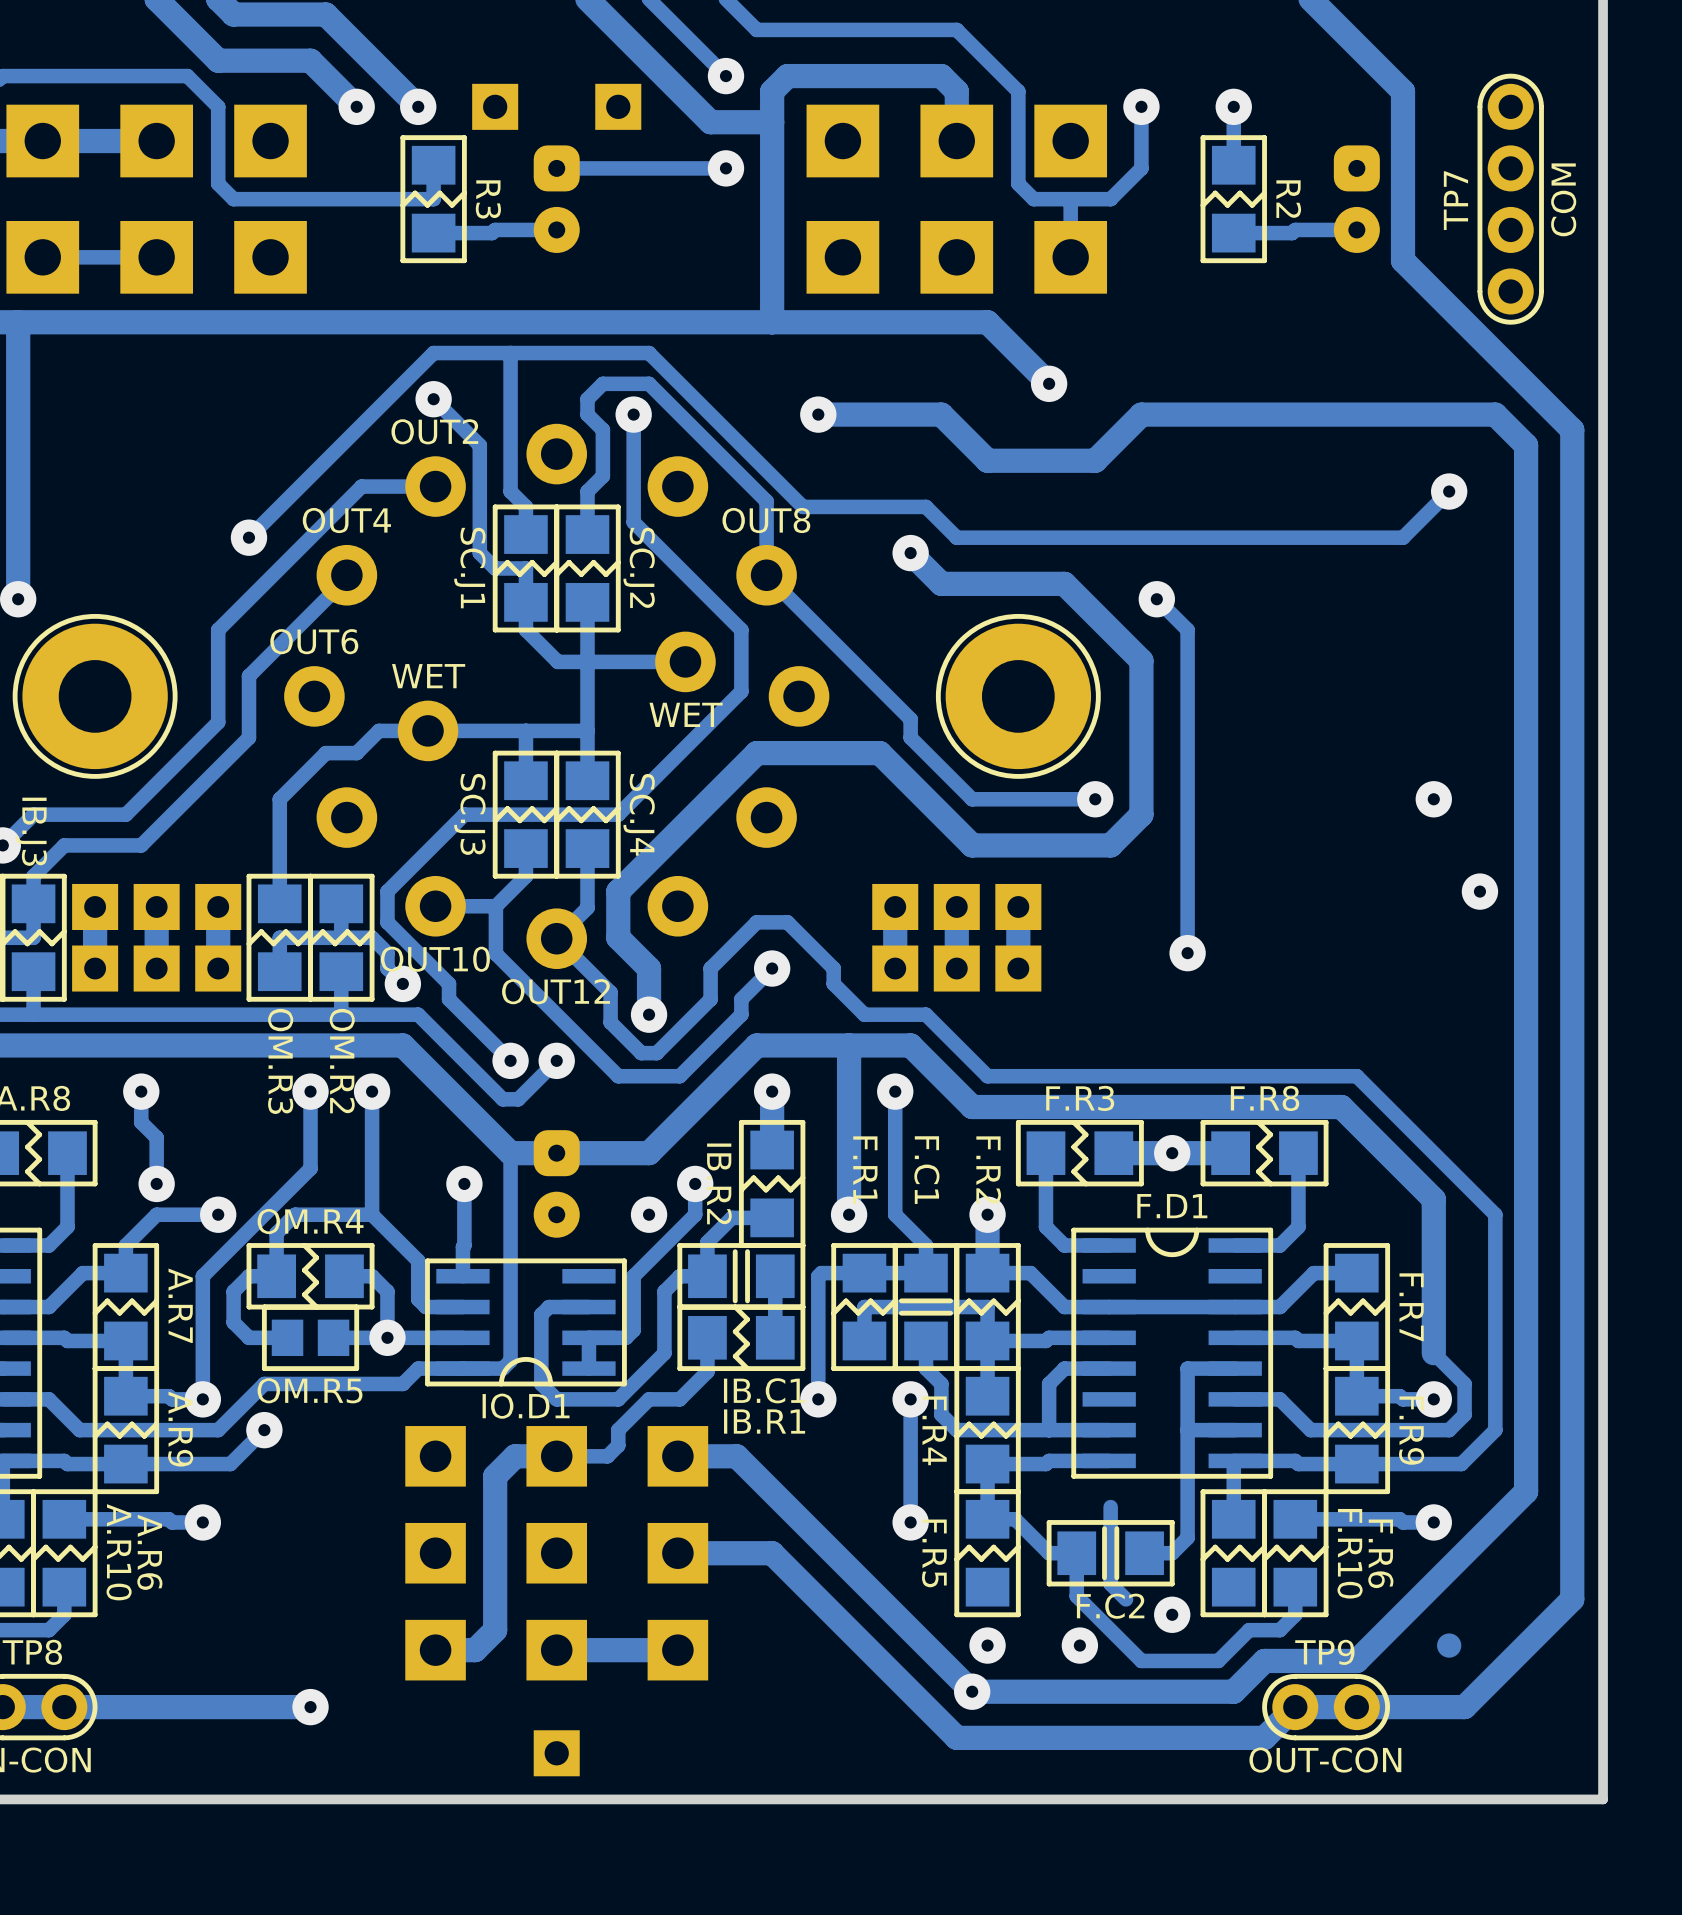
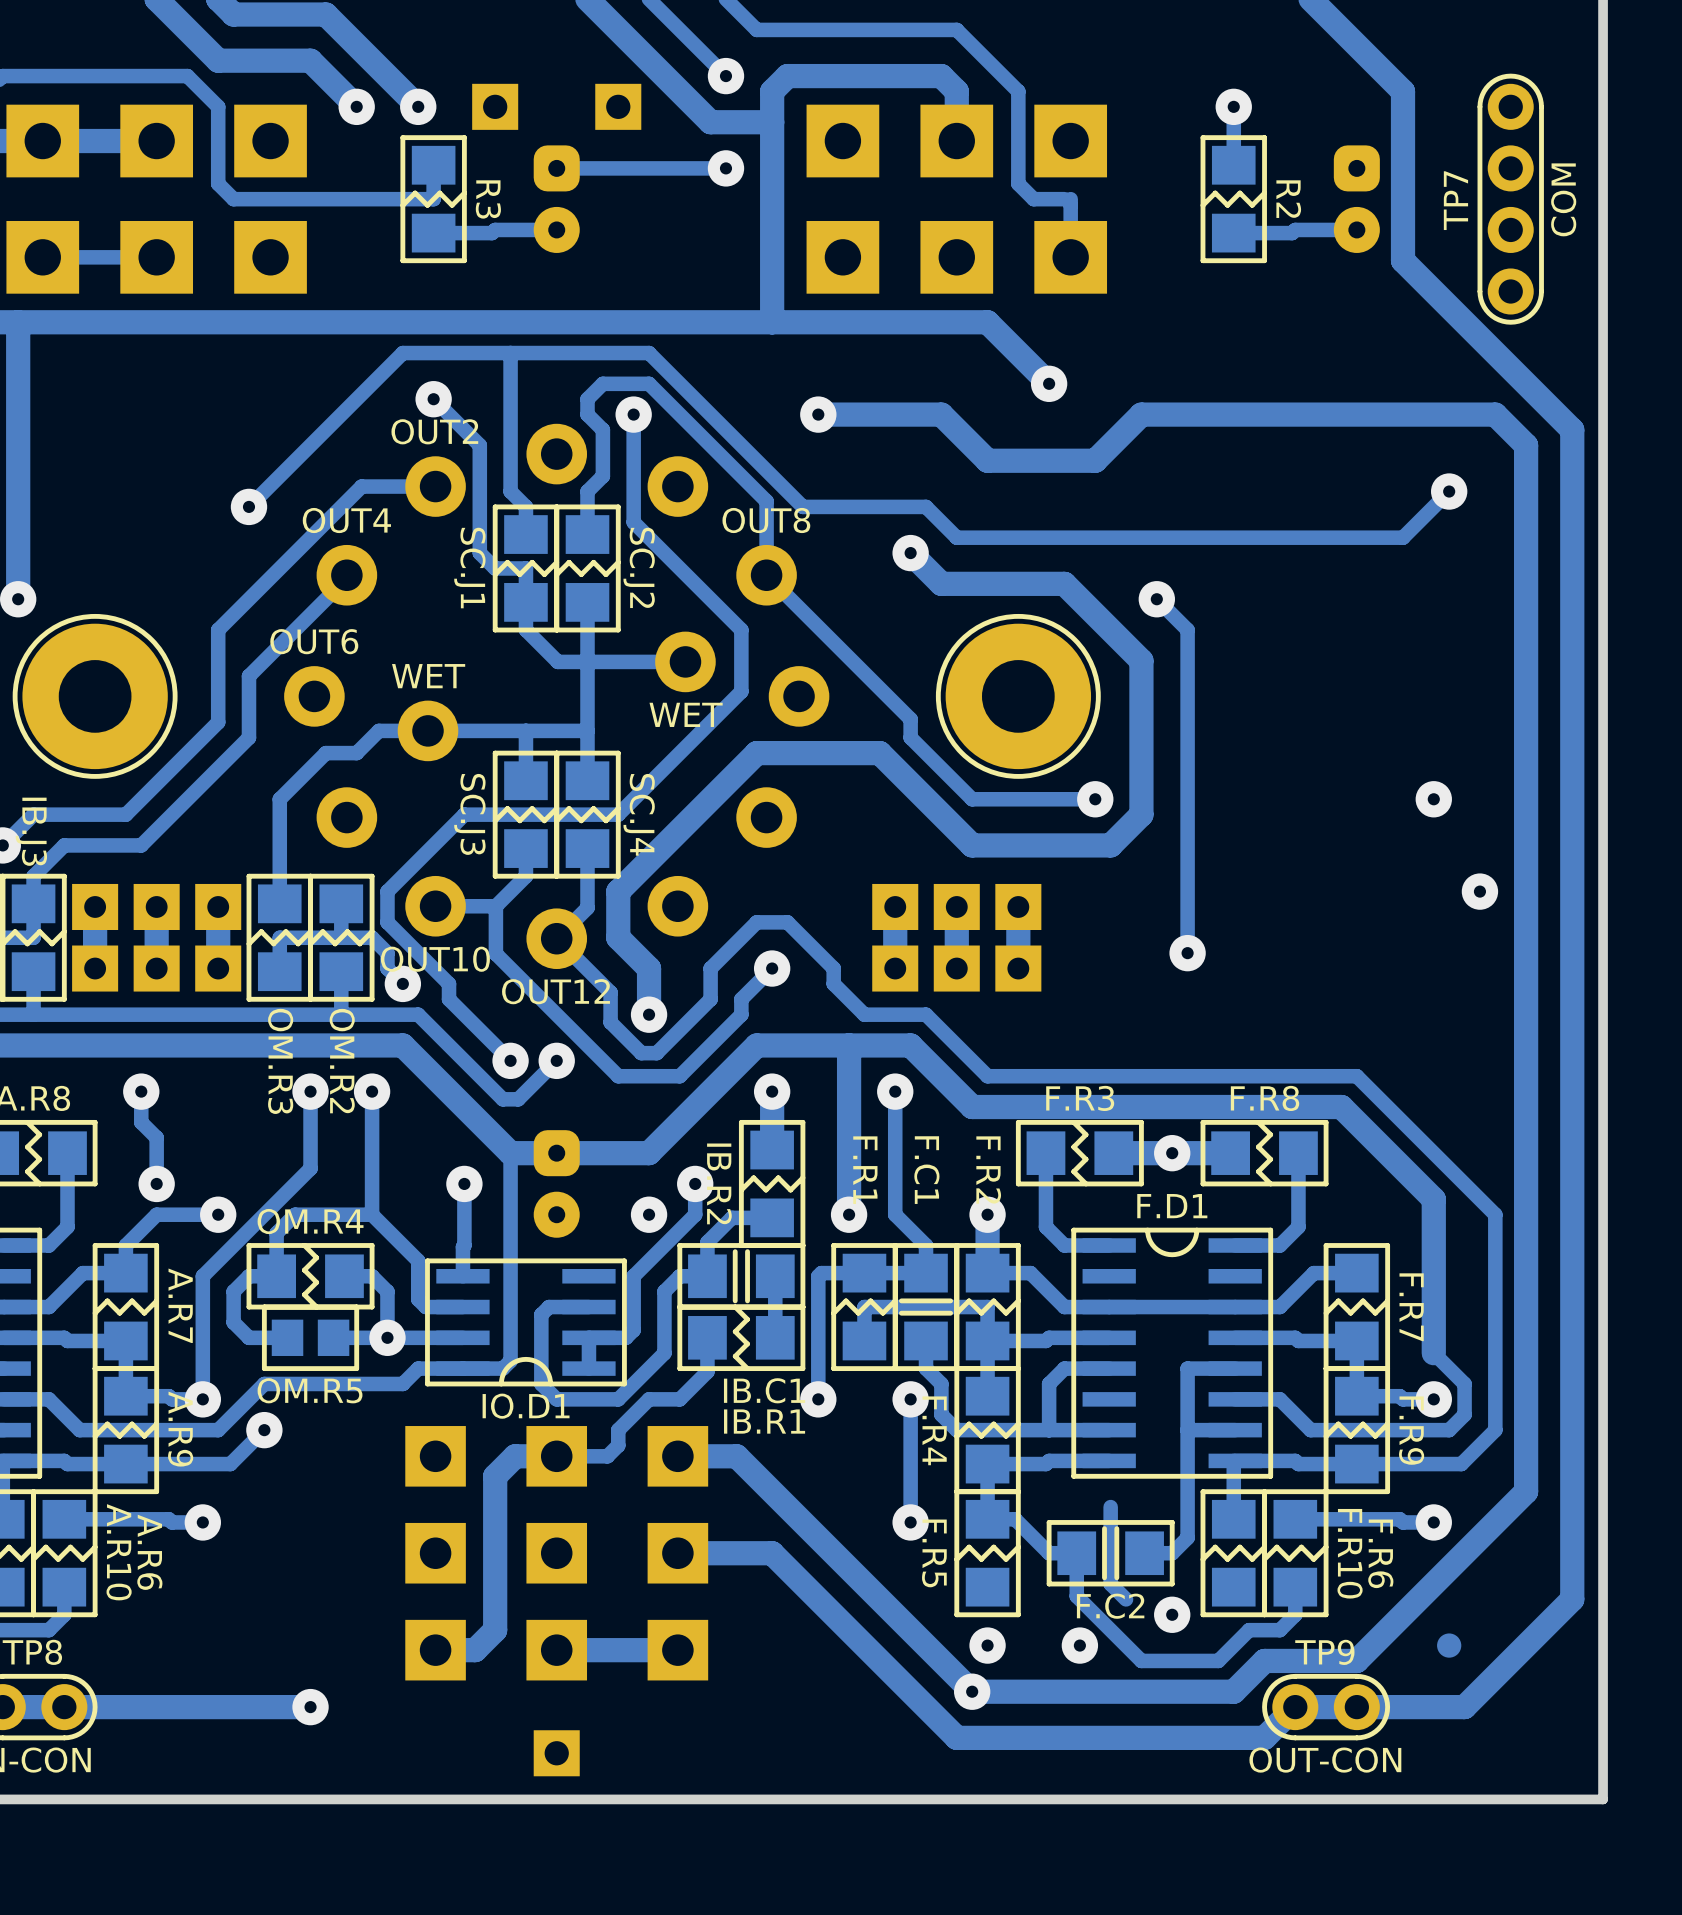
track: (1141, 106) (1141, 168) (1110, 199) (1064, 199) -> none
via: (1141, 106) -> none
track: (433, 353) (248, 537) -> (433, 353) (402, 353) (248, 506)
via position: (248, 537) -> (248, 506)

